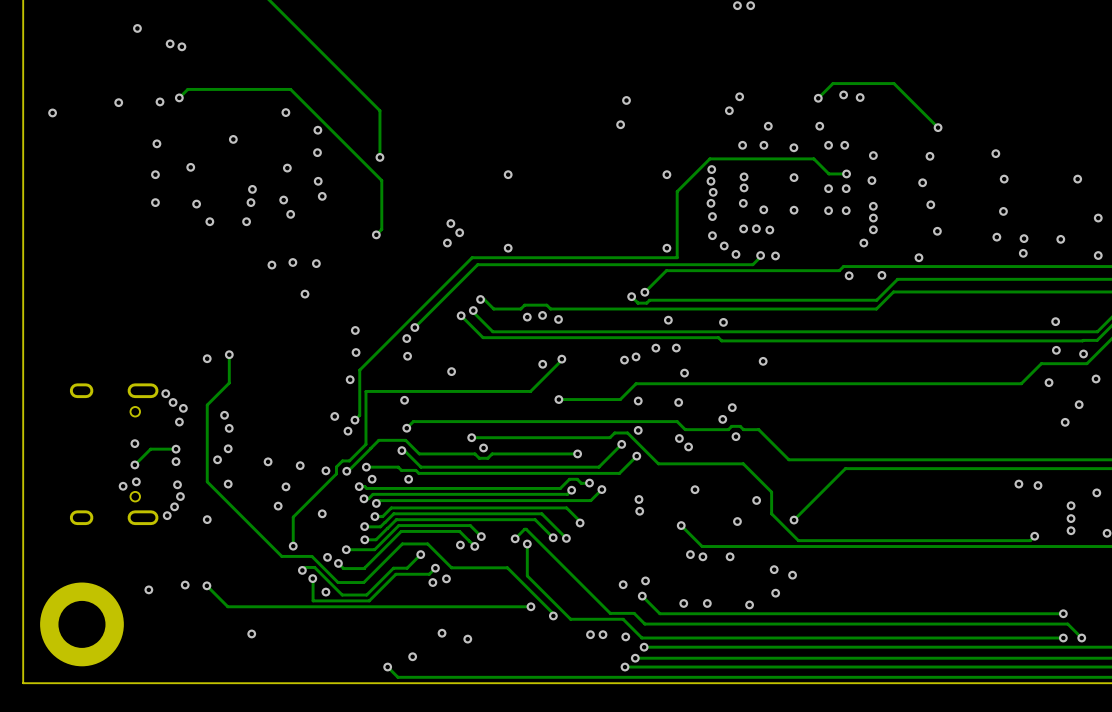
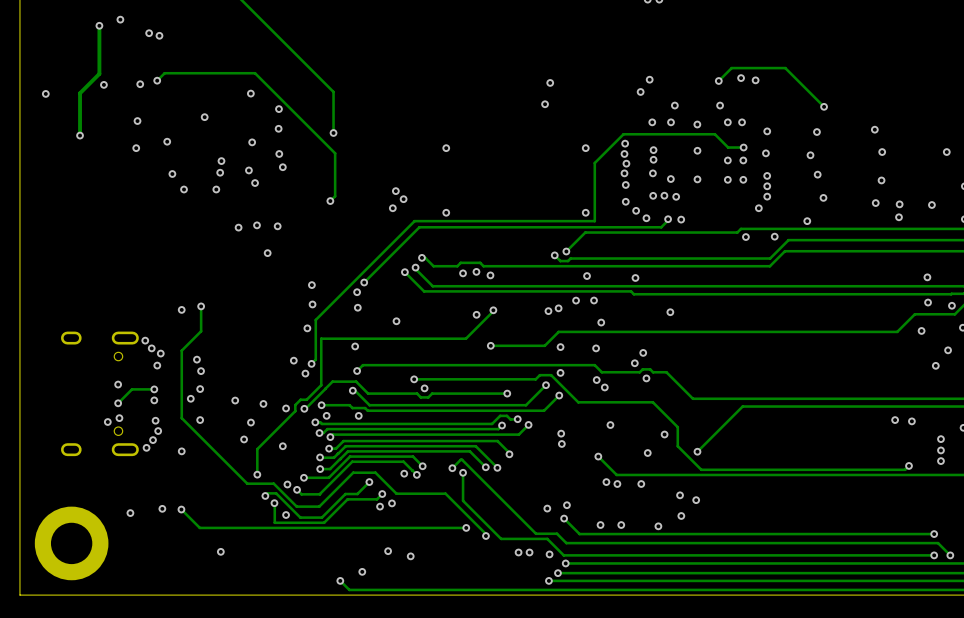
track: none -> (99, 25) (99, 73) (80, 93) (80, 135)
via: none -> (99, 25)
via position: (155, 202) -> (80, 135)

